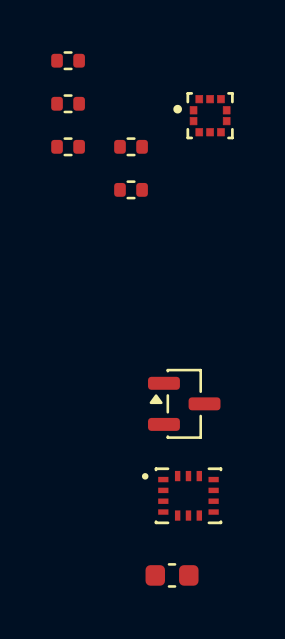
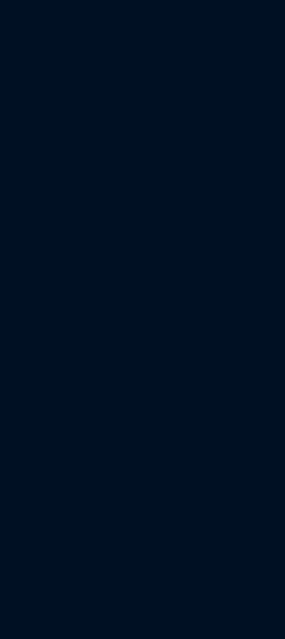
part: (68, 60) -> none
part: (68, 103) -> none
part: (203, 115) -> none
part: (68, 146) -> none
part: (131, 146) -> none
part: (131, 189) -> none
part: (184, 403) -> none
part: (182, 495) -> none
part: (172, 575) -> none

